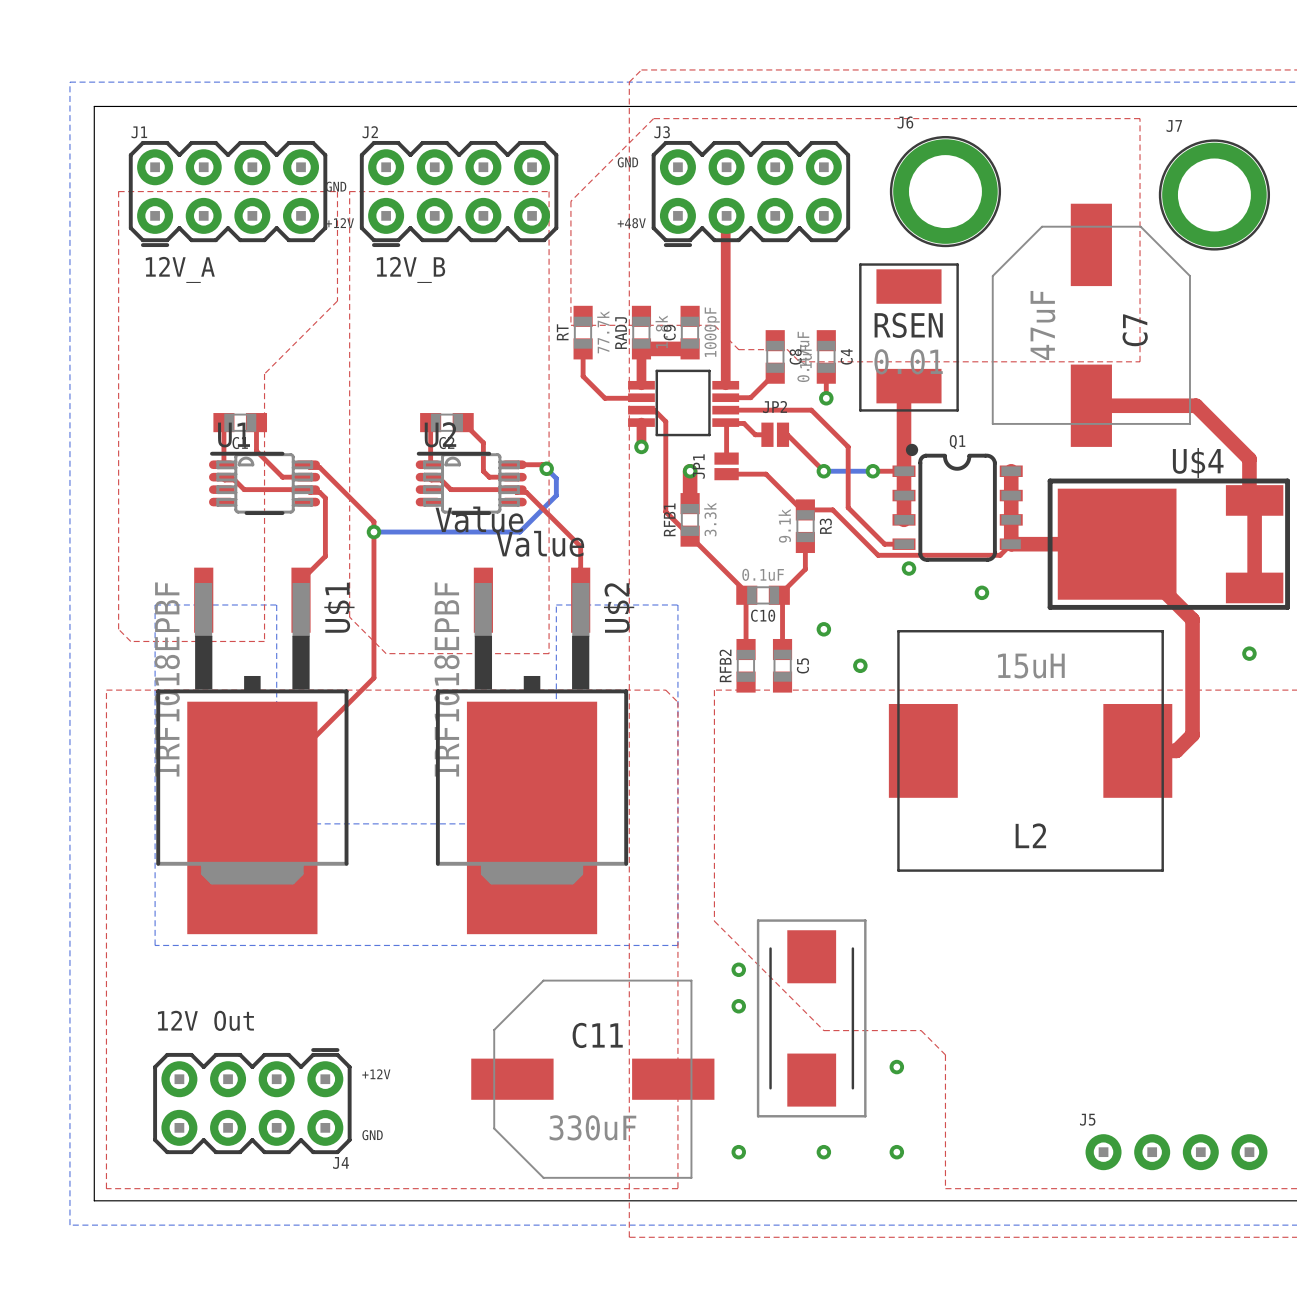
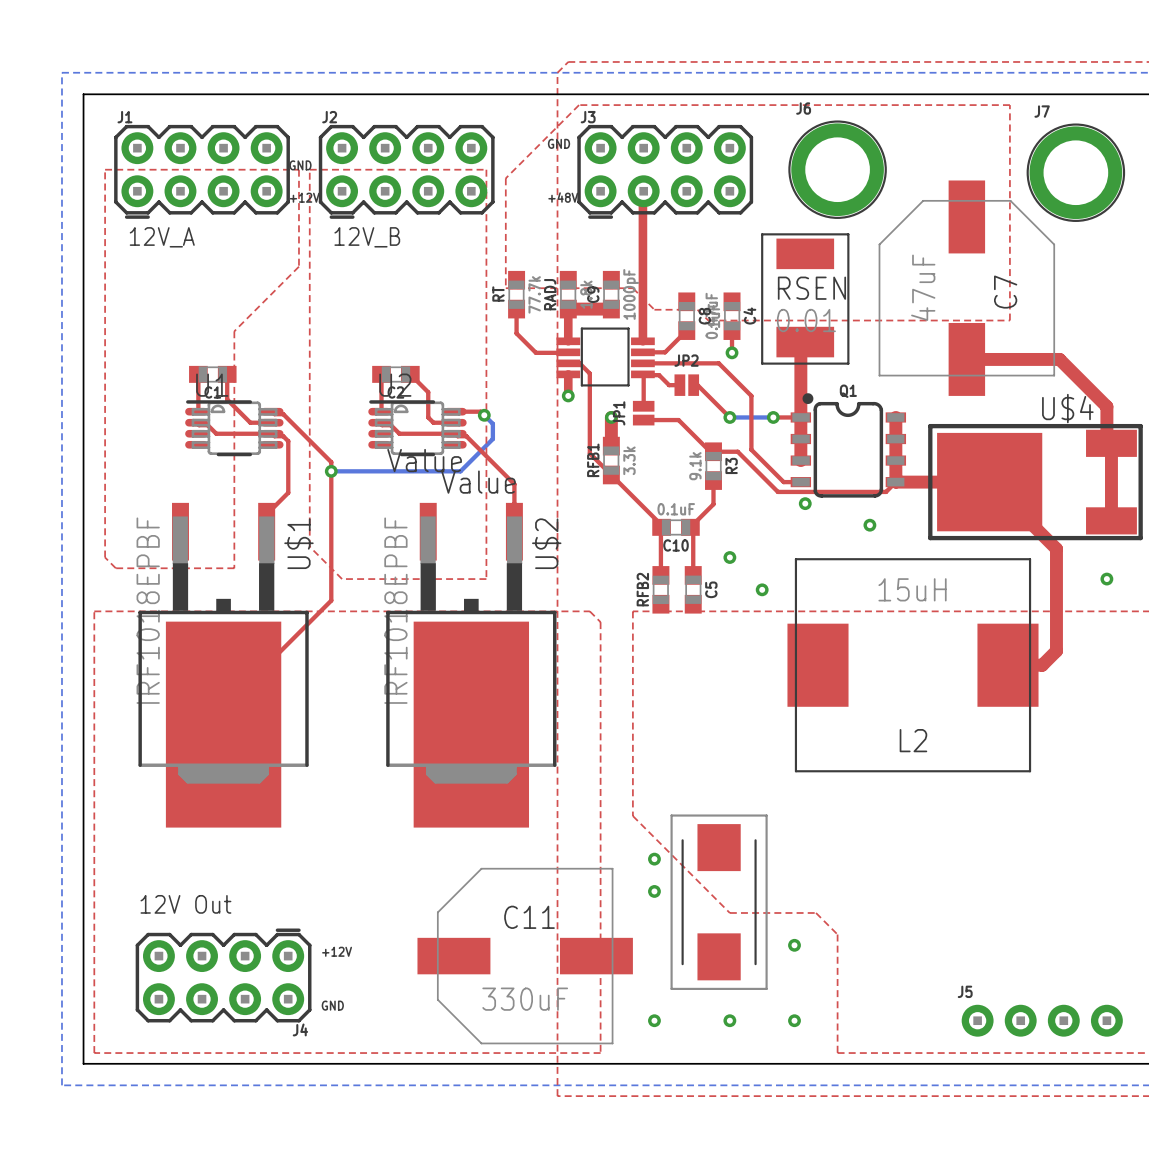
bottom zone outline: (155, 604) (155, 945) (677, 945) (677, 604) (556, 604) (556, 823) (276, 823) (276, 604) (155, 604) -> none

